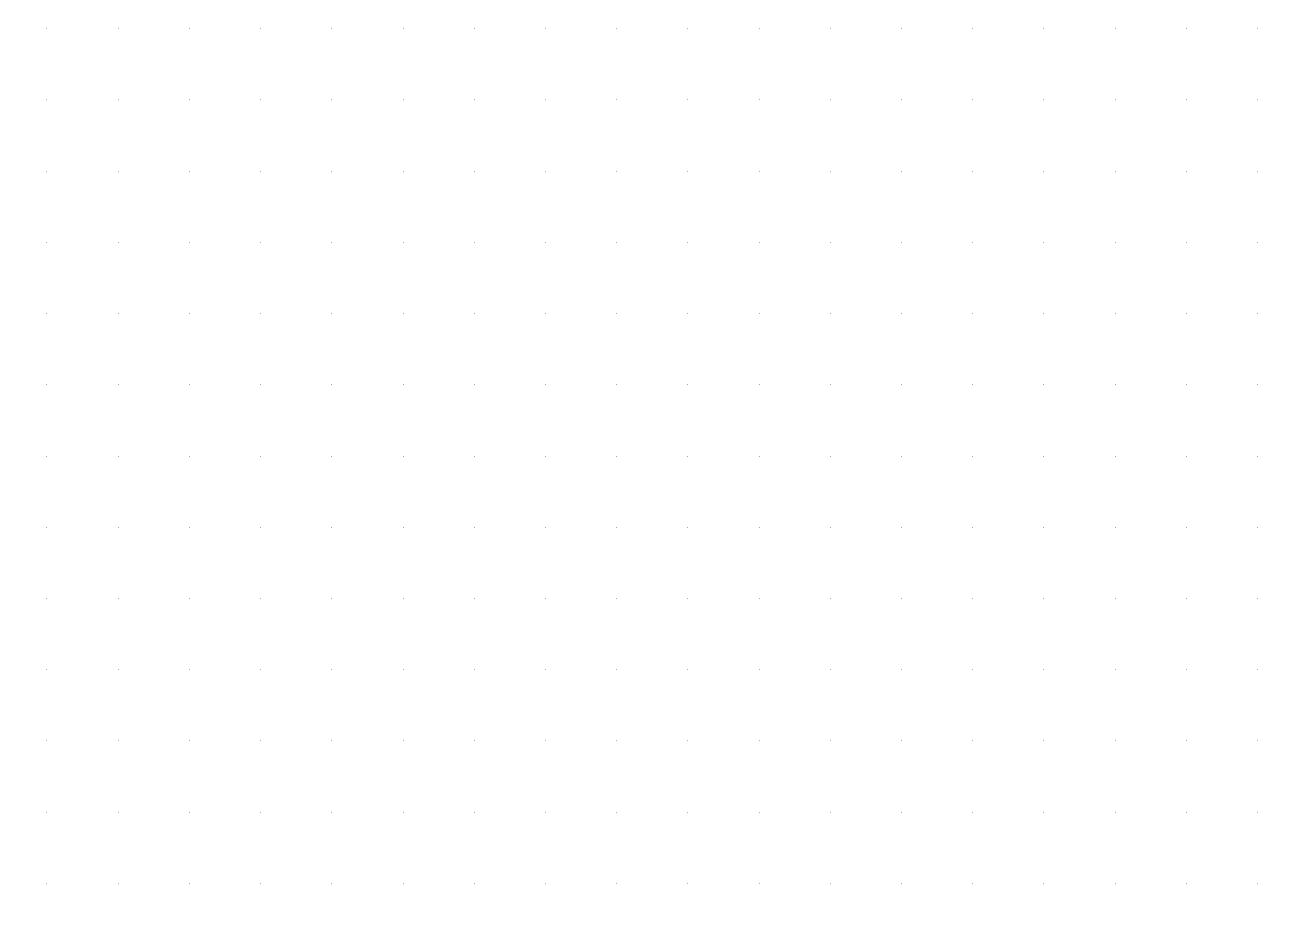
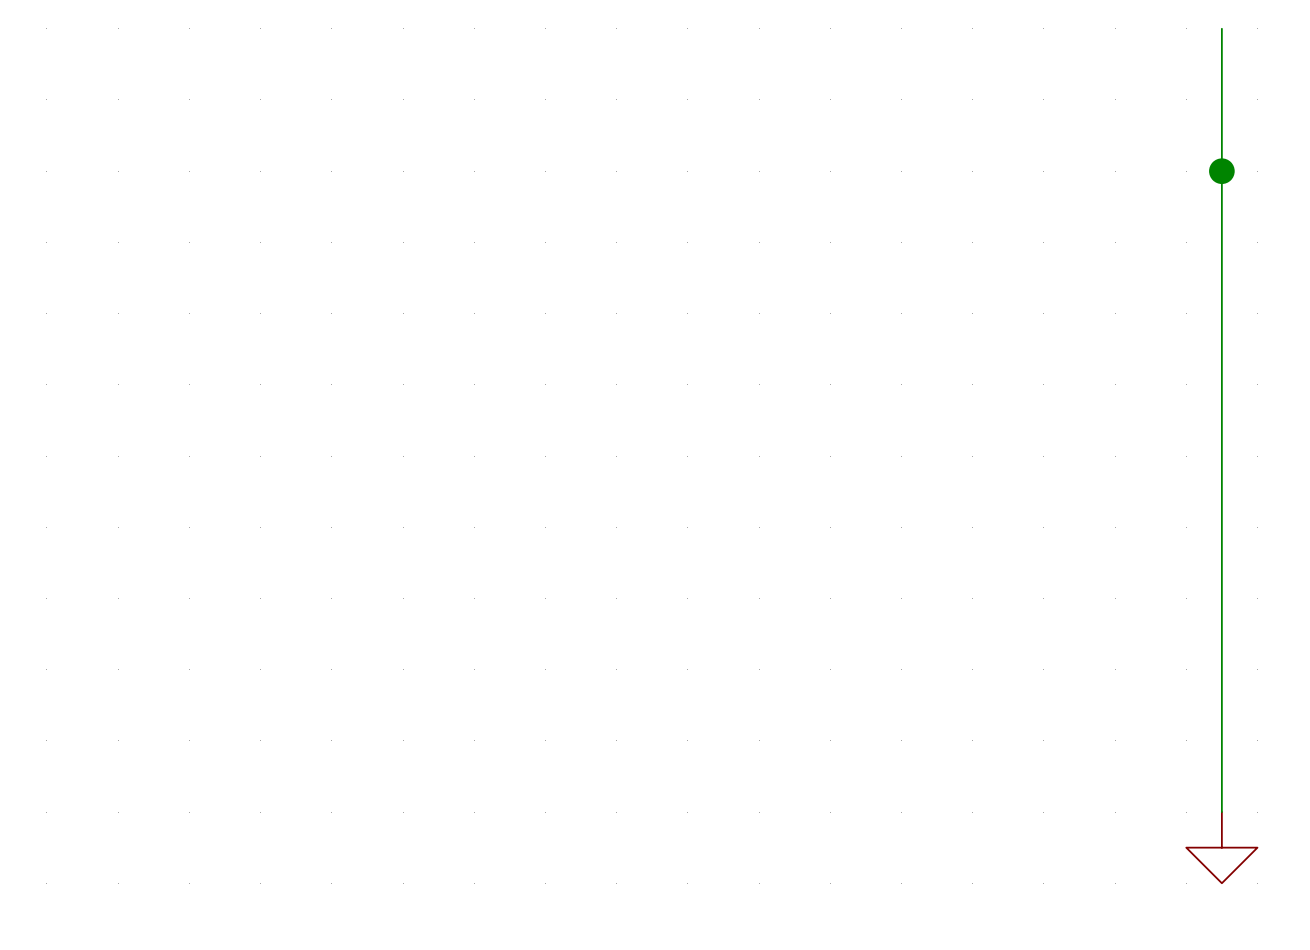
wire: none -> (1221, 28) (1221, 812)
junction: none -> (1221, 171)
power symbol: none -> (1221, 847)

